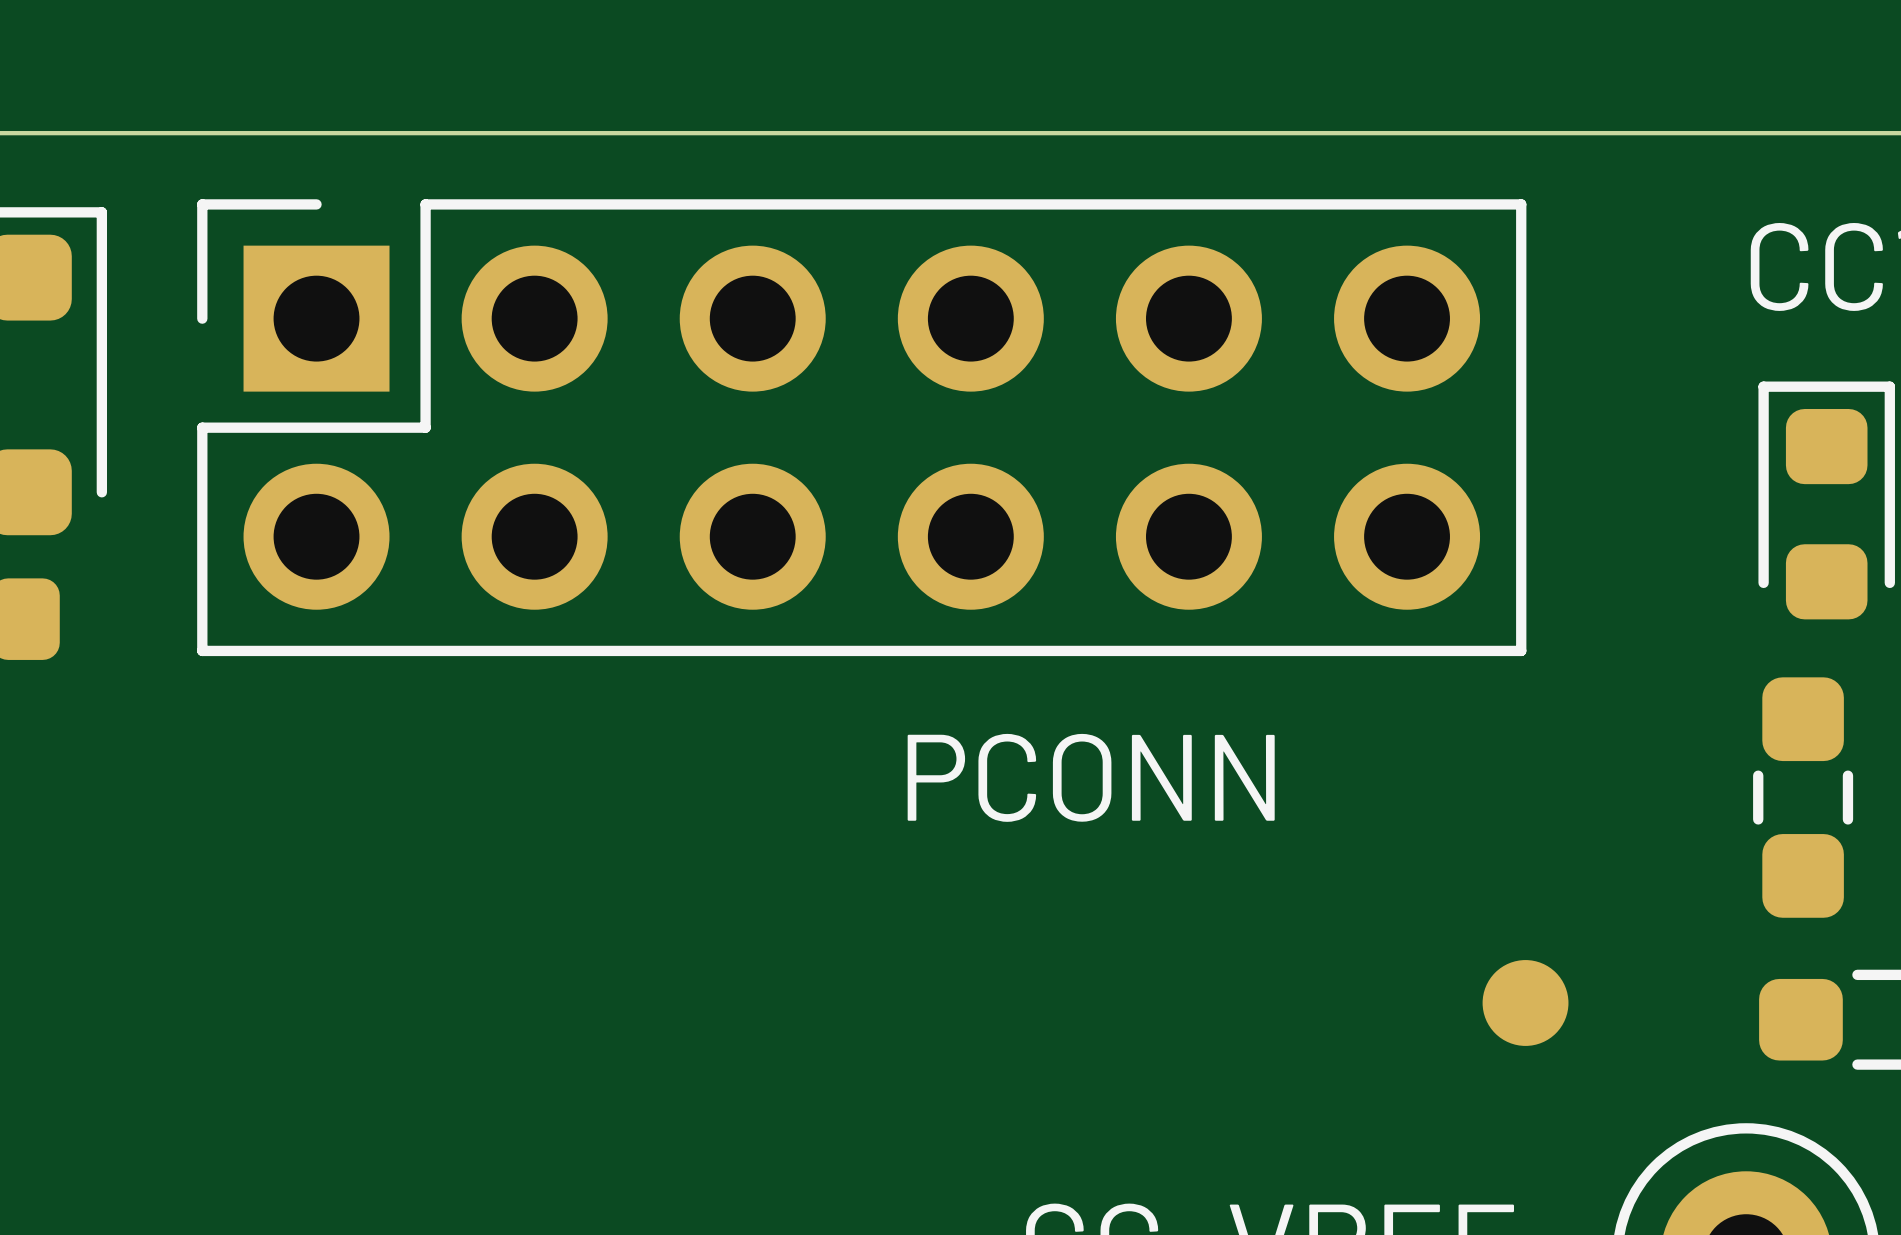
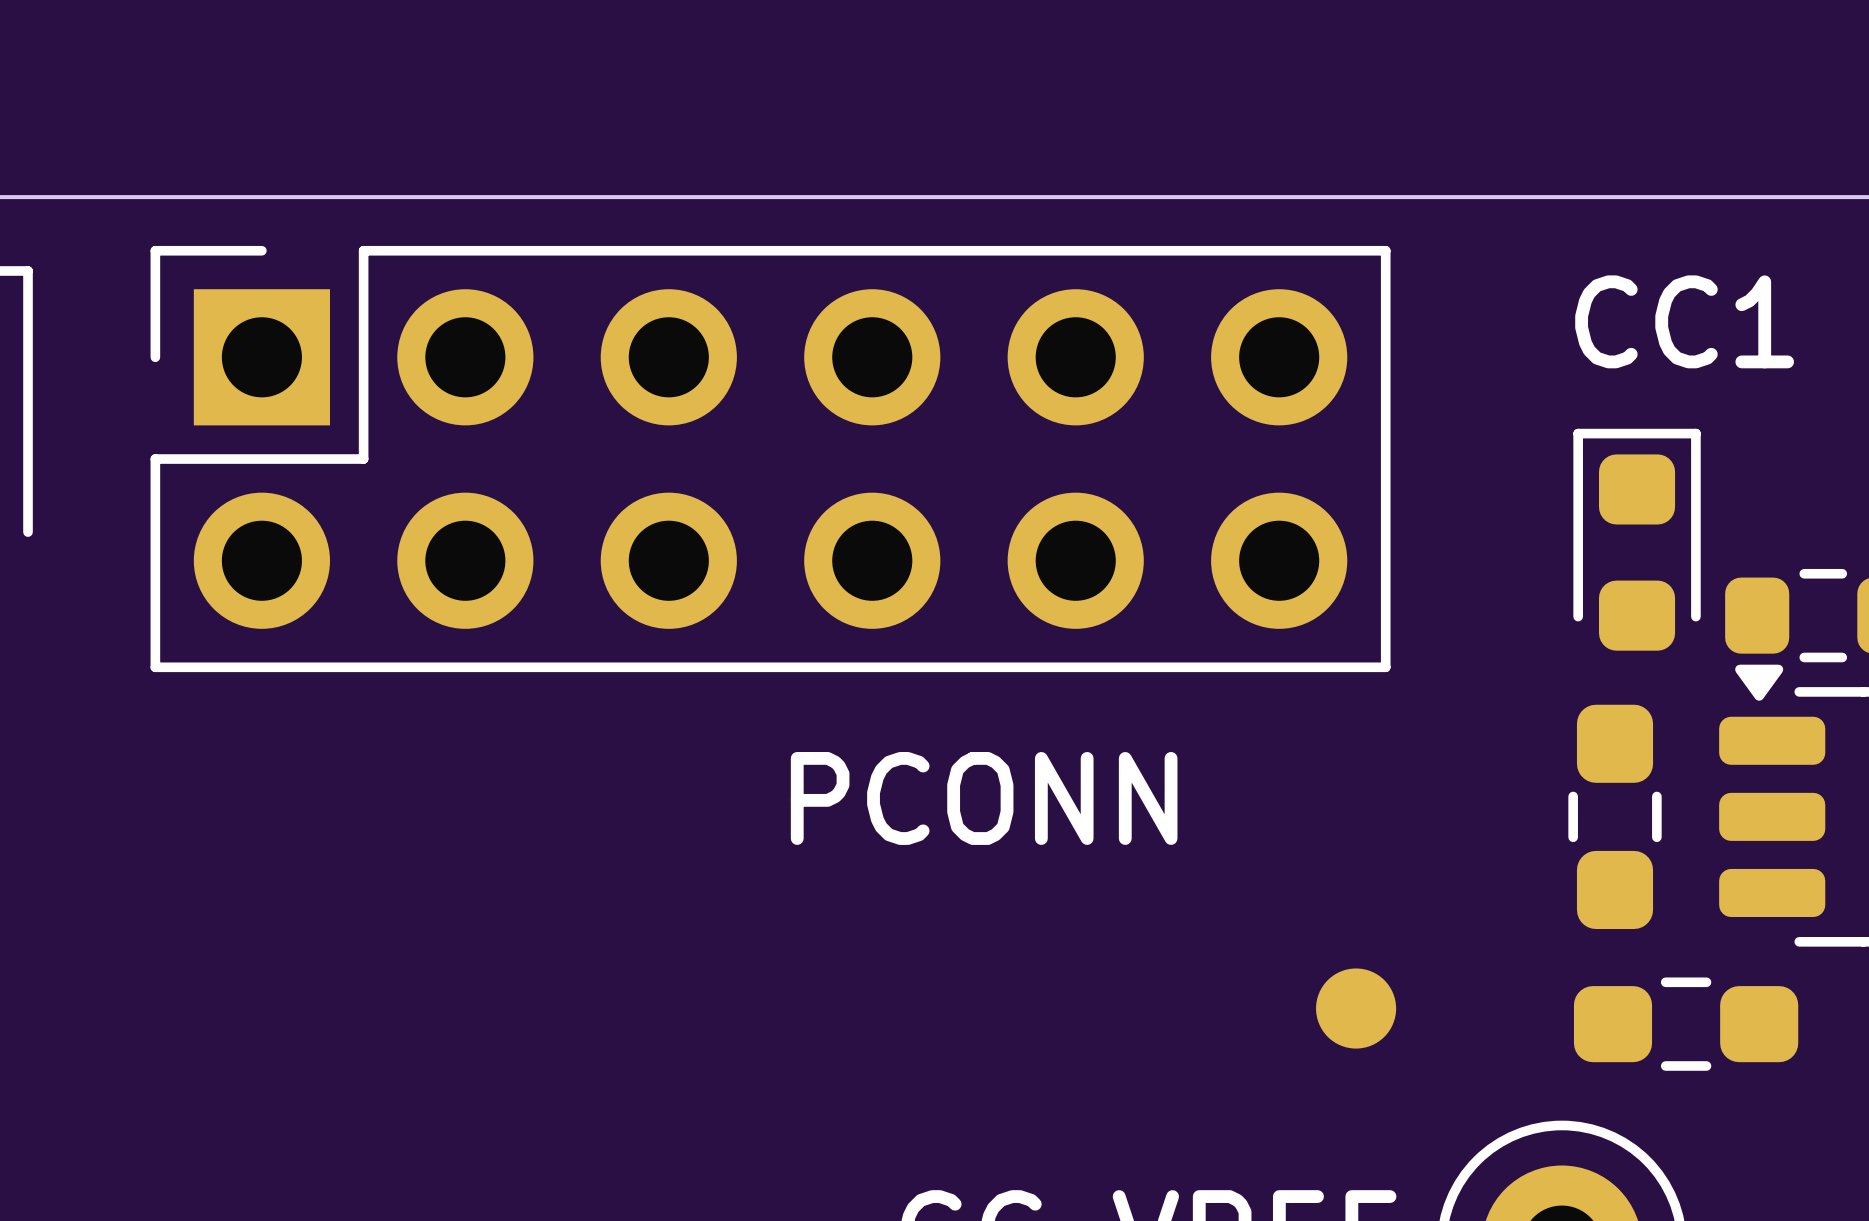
part position: (861, 427) -> (770, 459)

